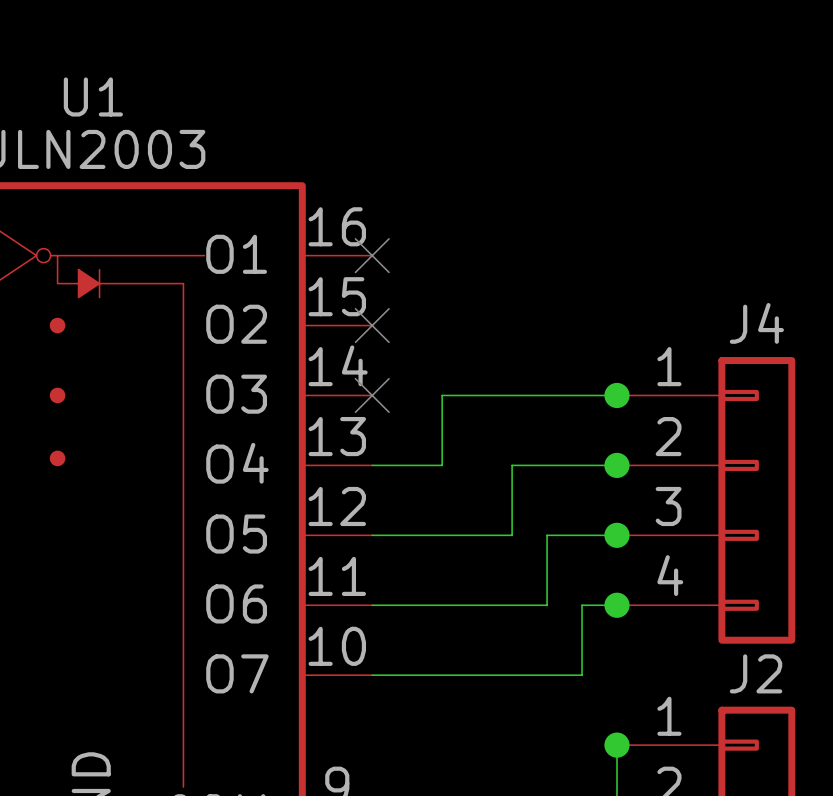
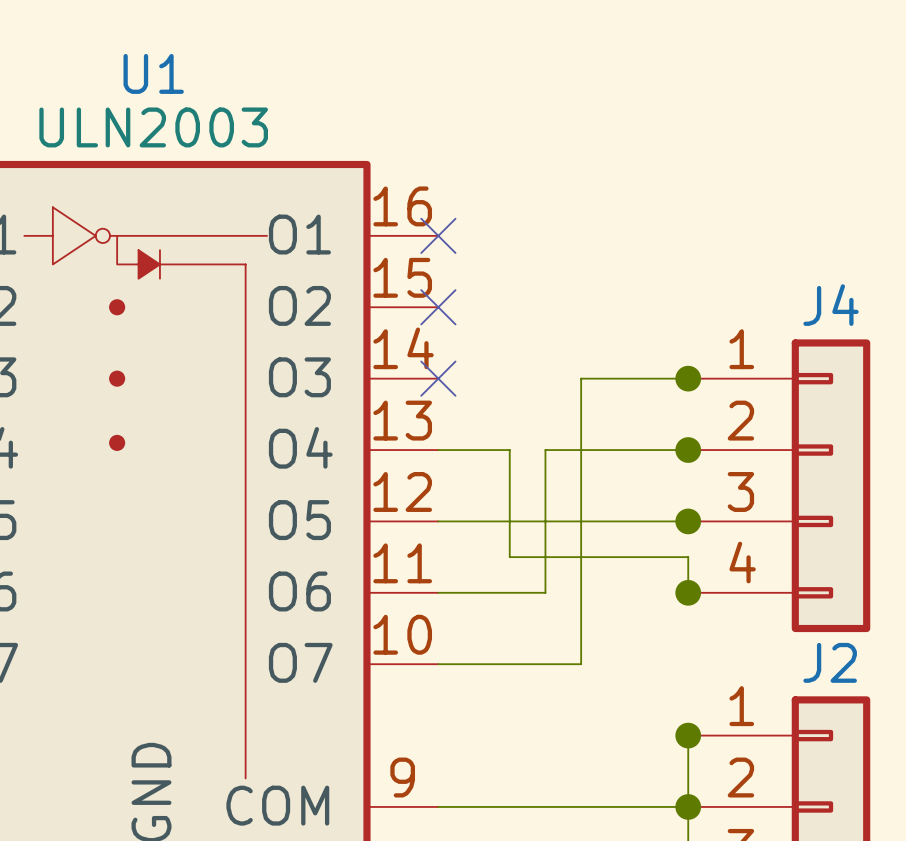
wire: (512, 395) (442, 395) (442, 465) -> (581, 378) (581, 450) (545, 450) (545, 592)
wire: (547, 535) (547, 605) (477, 605) -> (616, 521) (581, 521) (581, 664)
wire: (616, 605) (582, 605) (582, 675) (512, 675) -> (688, 592) (688, 557) (509, 557) (509, 450)

